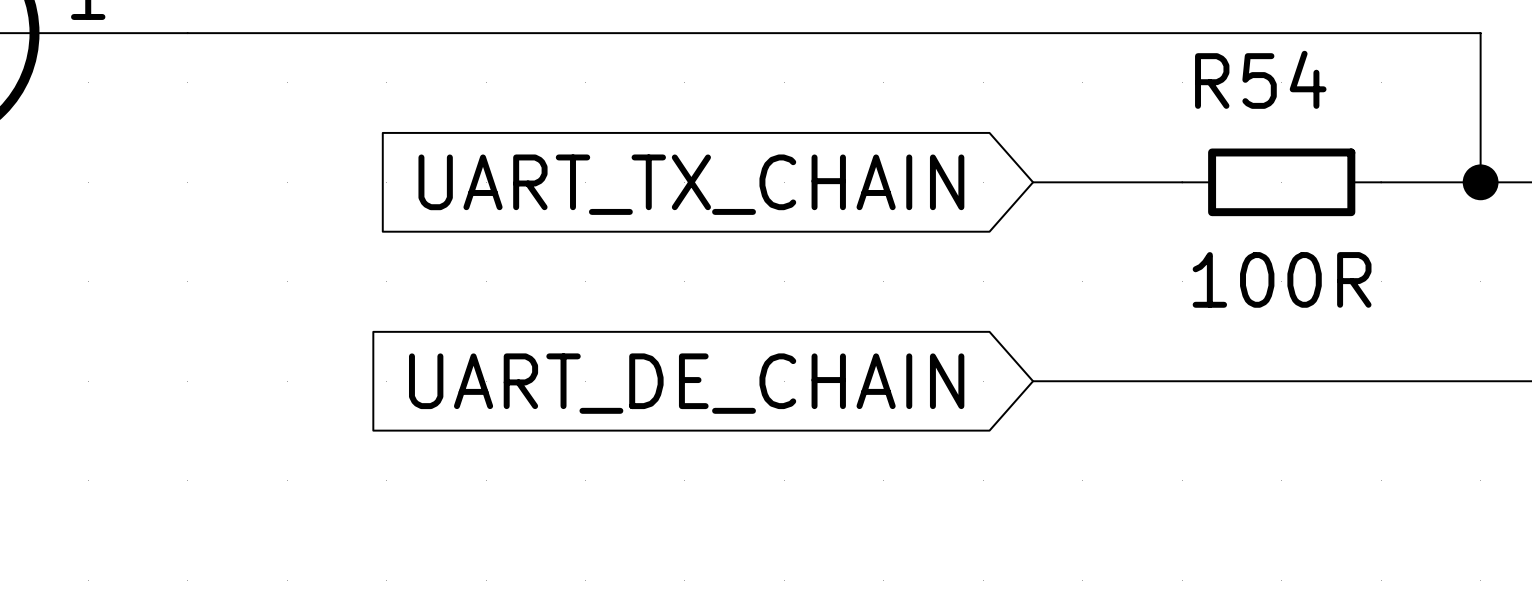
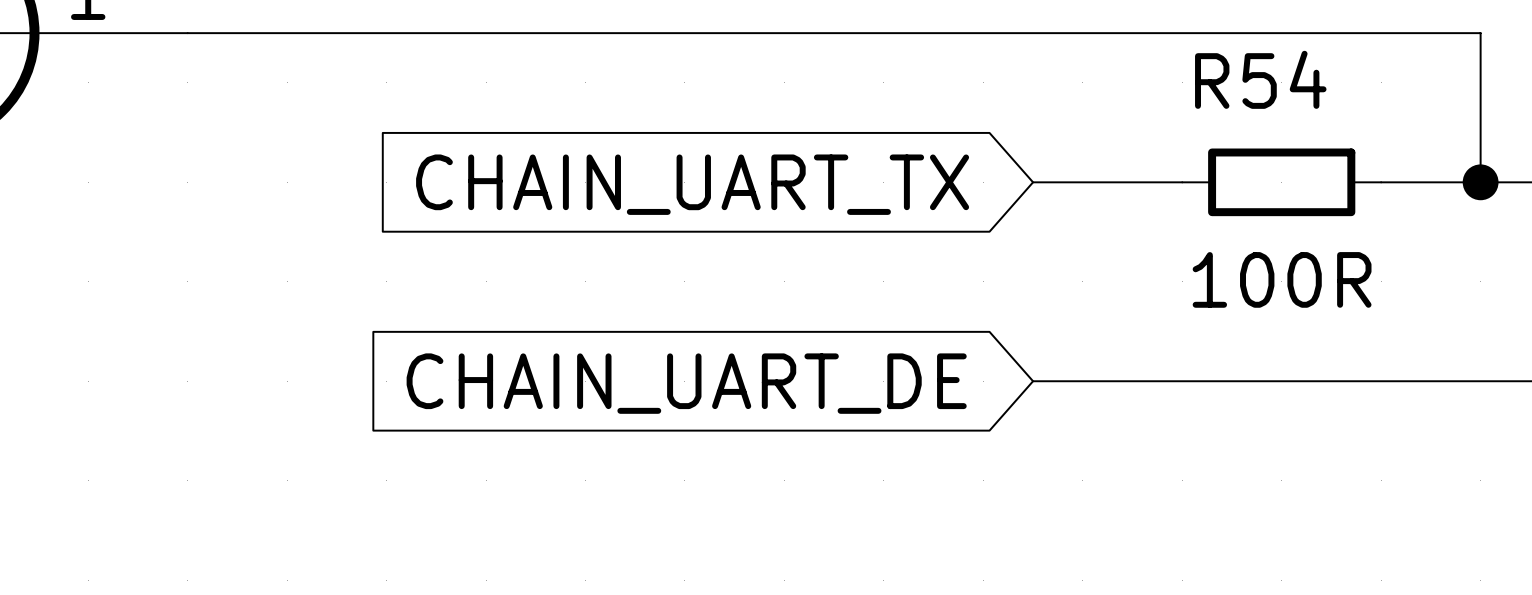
global label: UART_TX_CHAIN (691, 184) -> CHAIN_UART_TX (692, 184)
global label: UART_DE_CHAIN (686, 383) -> CHAIN_UART_DE (686, 383)

